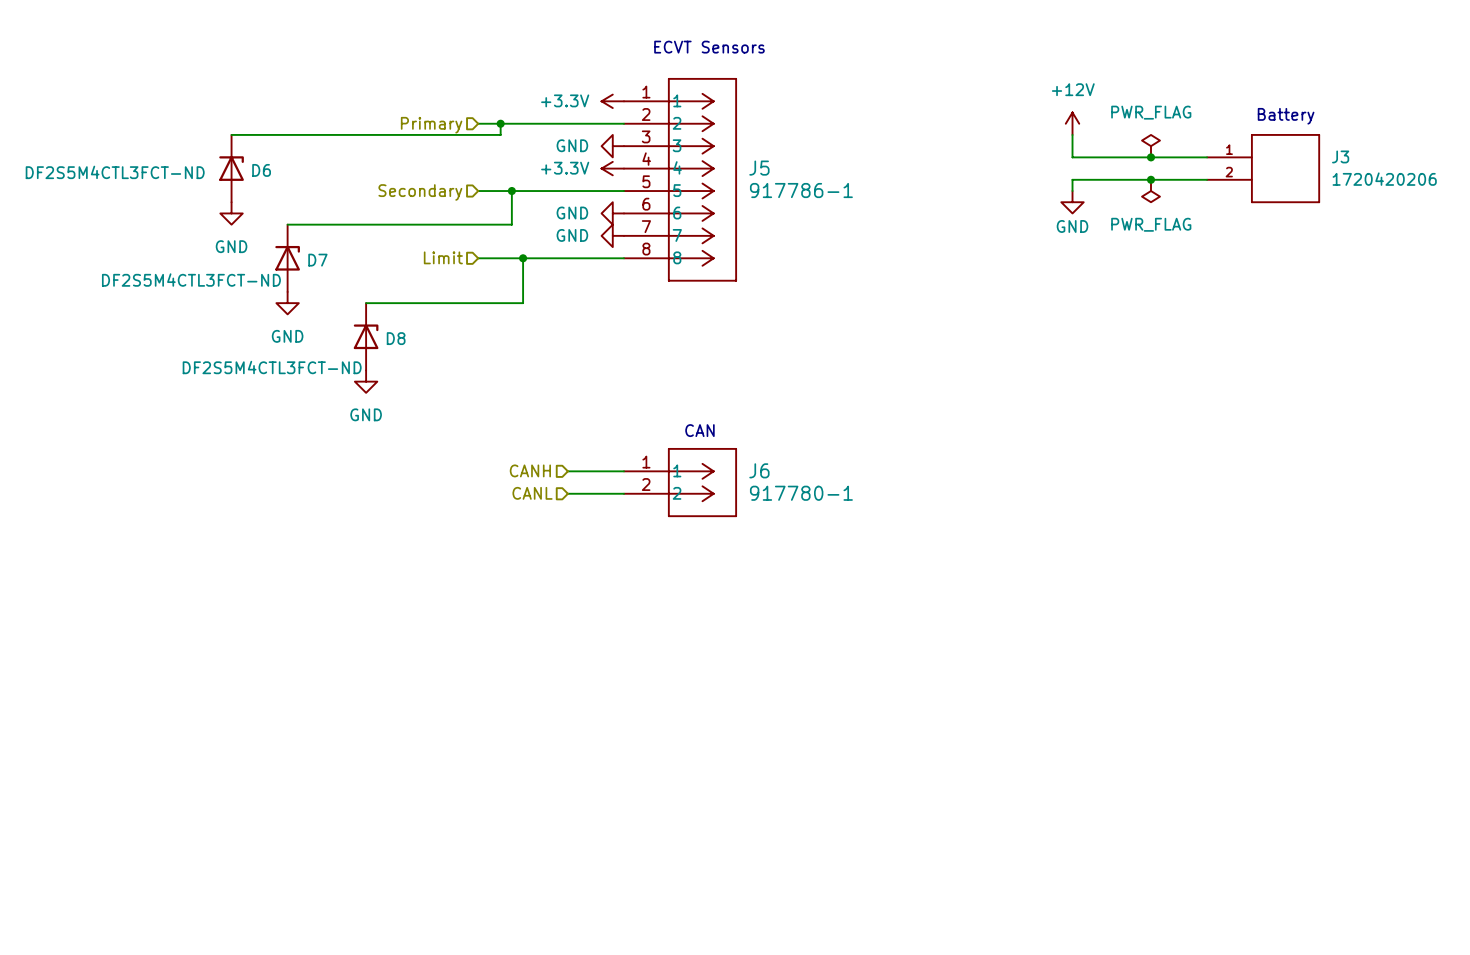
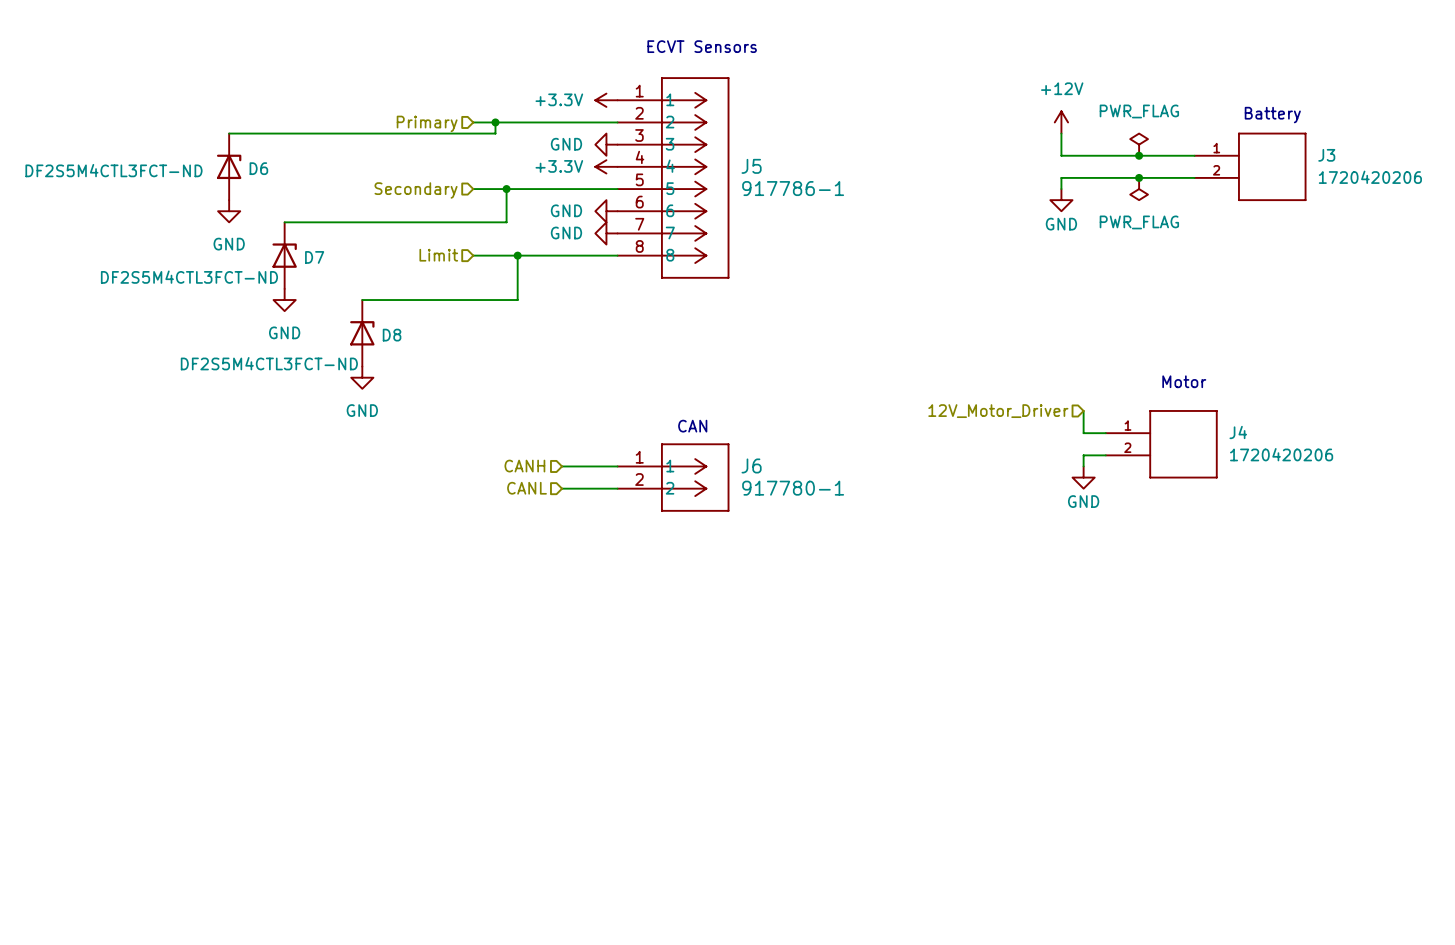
text: none -> Motor (1184, 381)
hierarchical label: none -> 12V_Motor_Driver (998, 411)
wire: none -> (1083, 410) (1083, 433) (1105, 433)
J4: none -> 1720420206 (1161, 444)
wire: none -> (1105, 455) (1083, 455) (1083, 466)
power symbol: none -> GND (1083, 477)

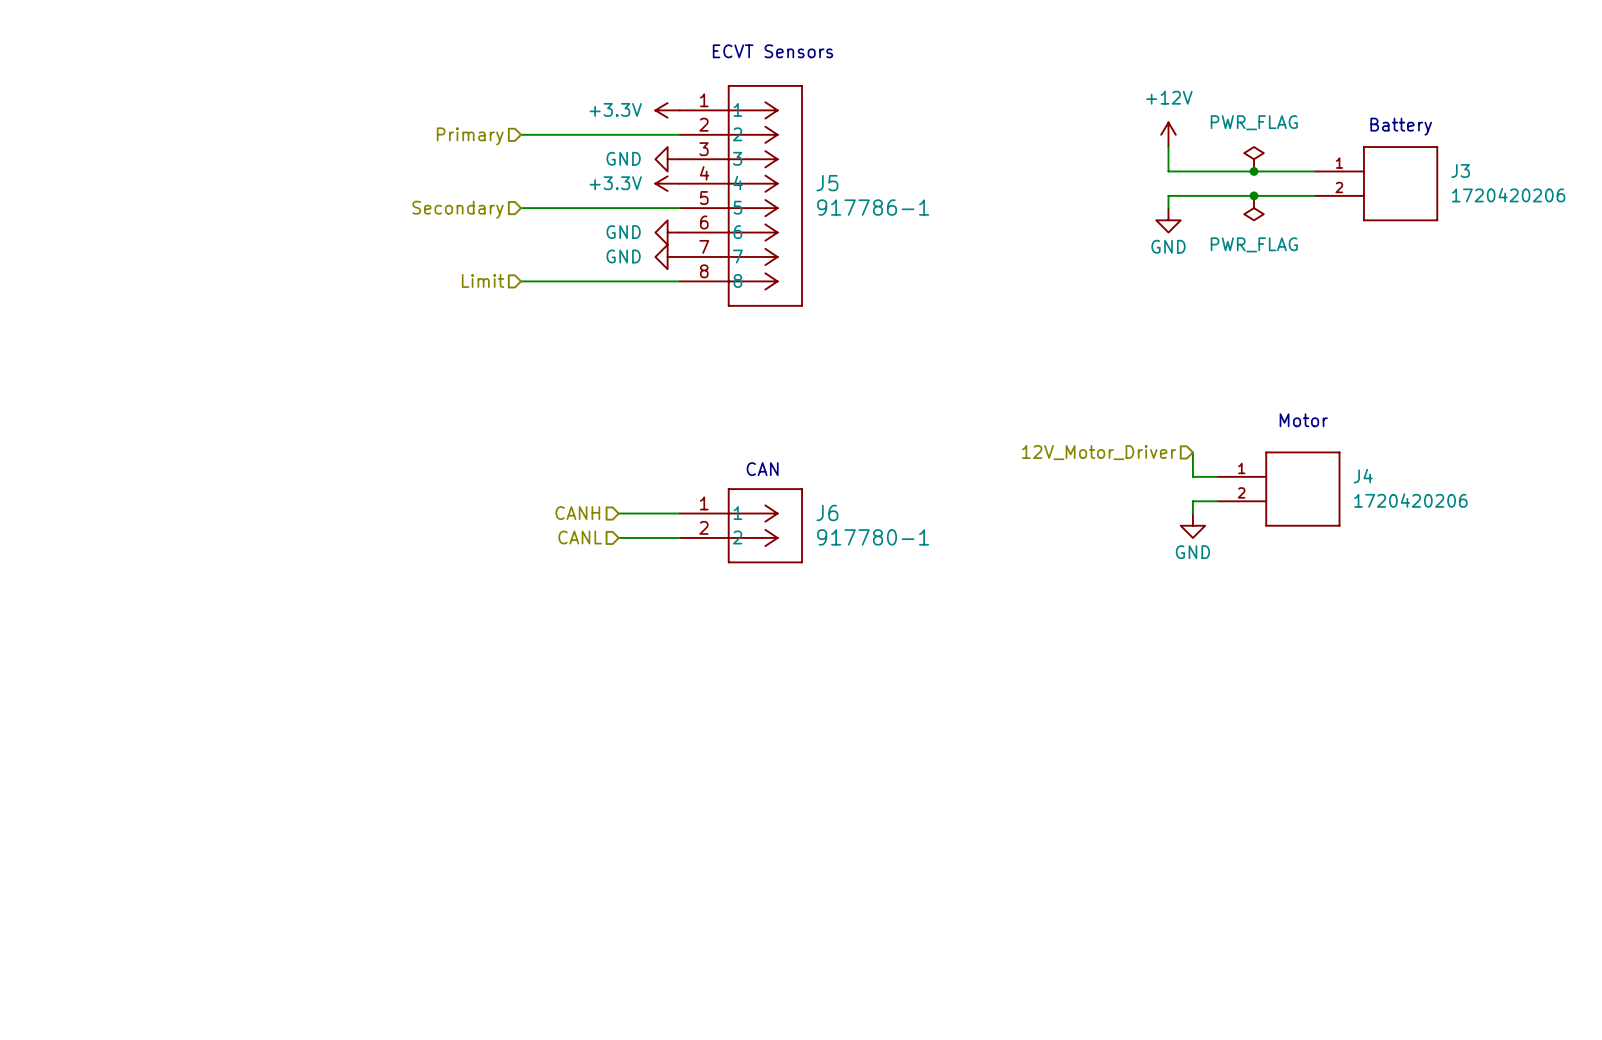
wire: (495, 122) (495, 133) (229, 133) -> none
junction: (495, 122) -> none
D6: DF2S5M4CTL3FCT-ND (229, 166) -> none
wire: (506, 189) (506, 222) (284, 222) -> none
junction: (506, 189) -> none
power symbol: GND (229, 211) -> none
D7: DF2S5M4CTL3FCT-ND (284, 255) -> none
wire: (517, 255) (517, 300) (362, 300) -> none
junction: (517, 255) -> none
power symbol: GND (284, 300) -> none
D8: DF2S5M4CTL3FCT-ND (362, 333) -> none
power symbol: GND (362, 377) -> none

